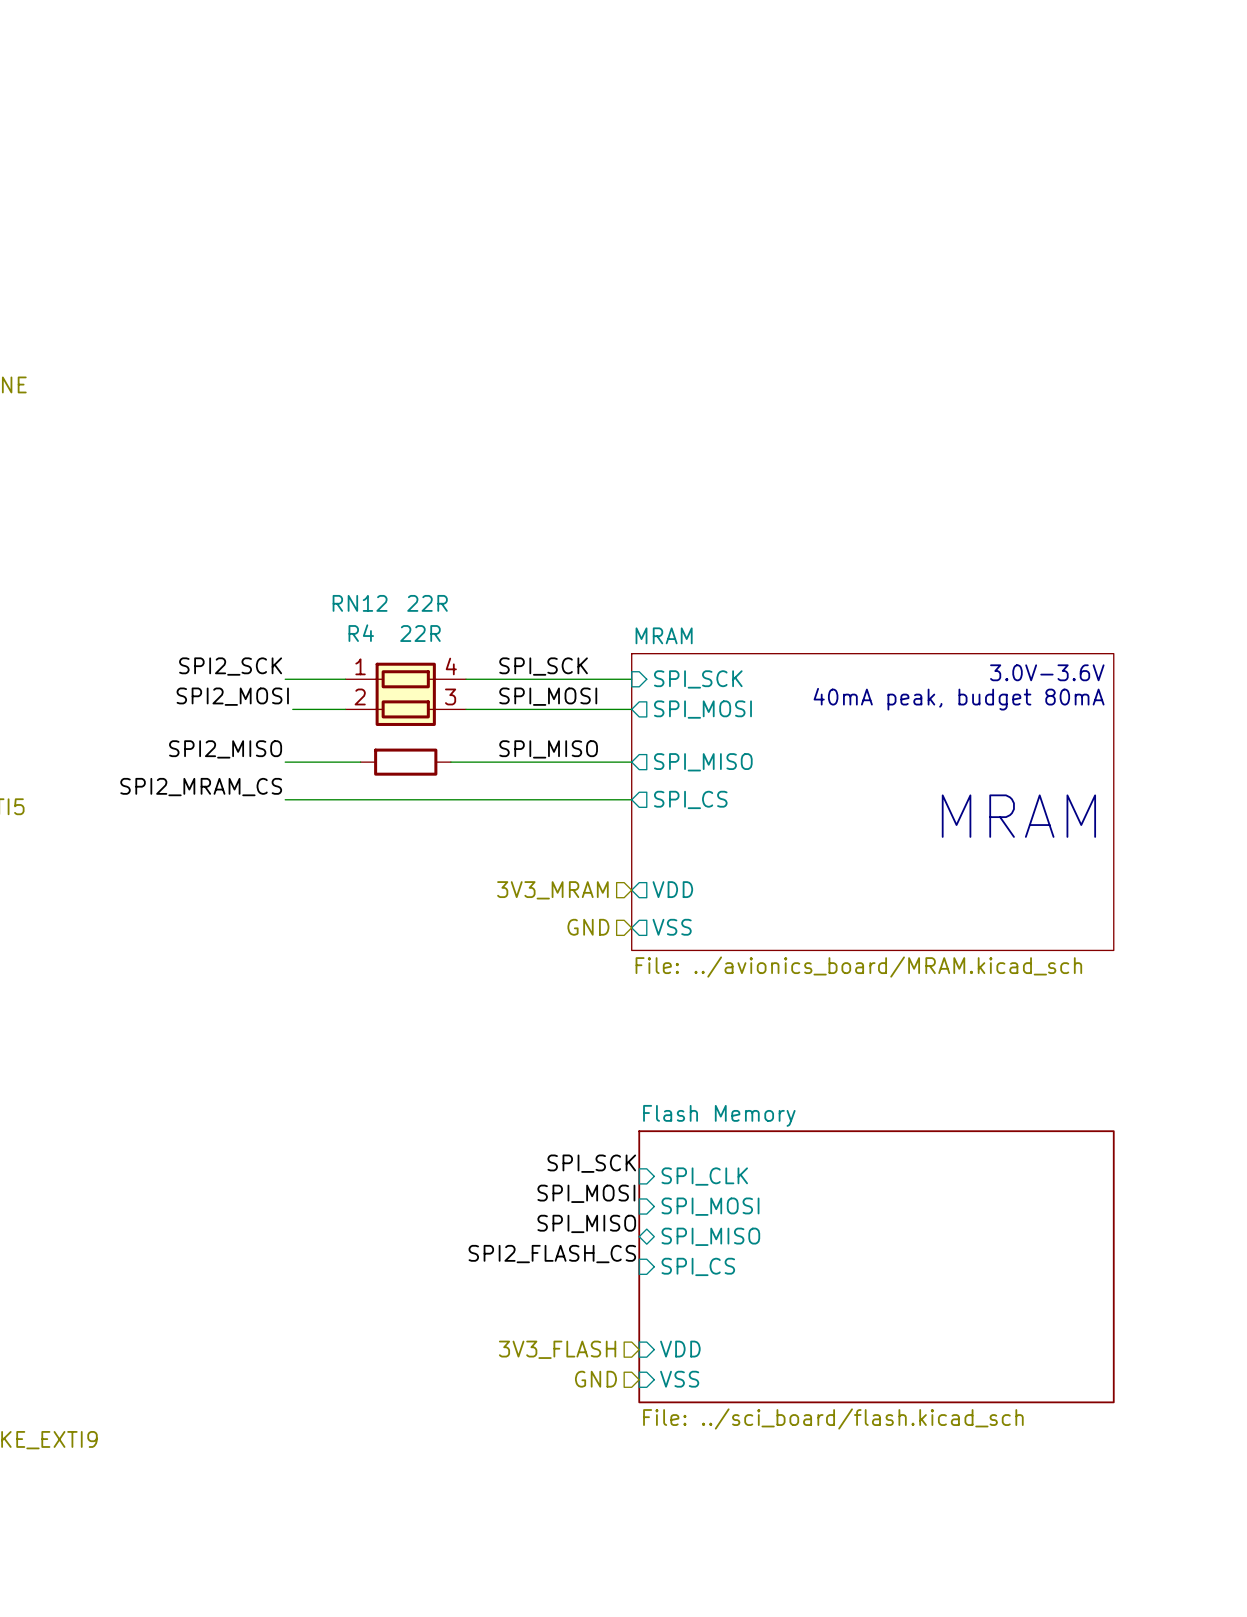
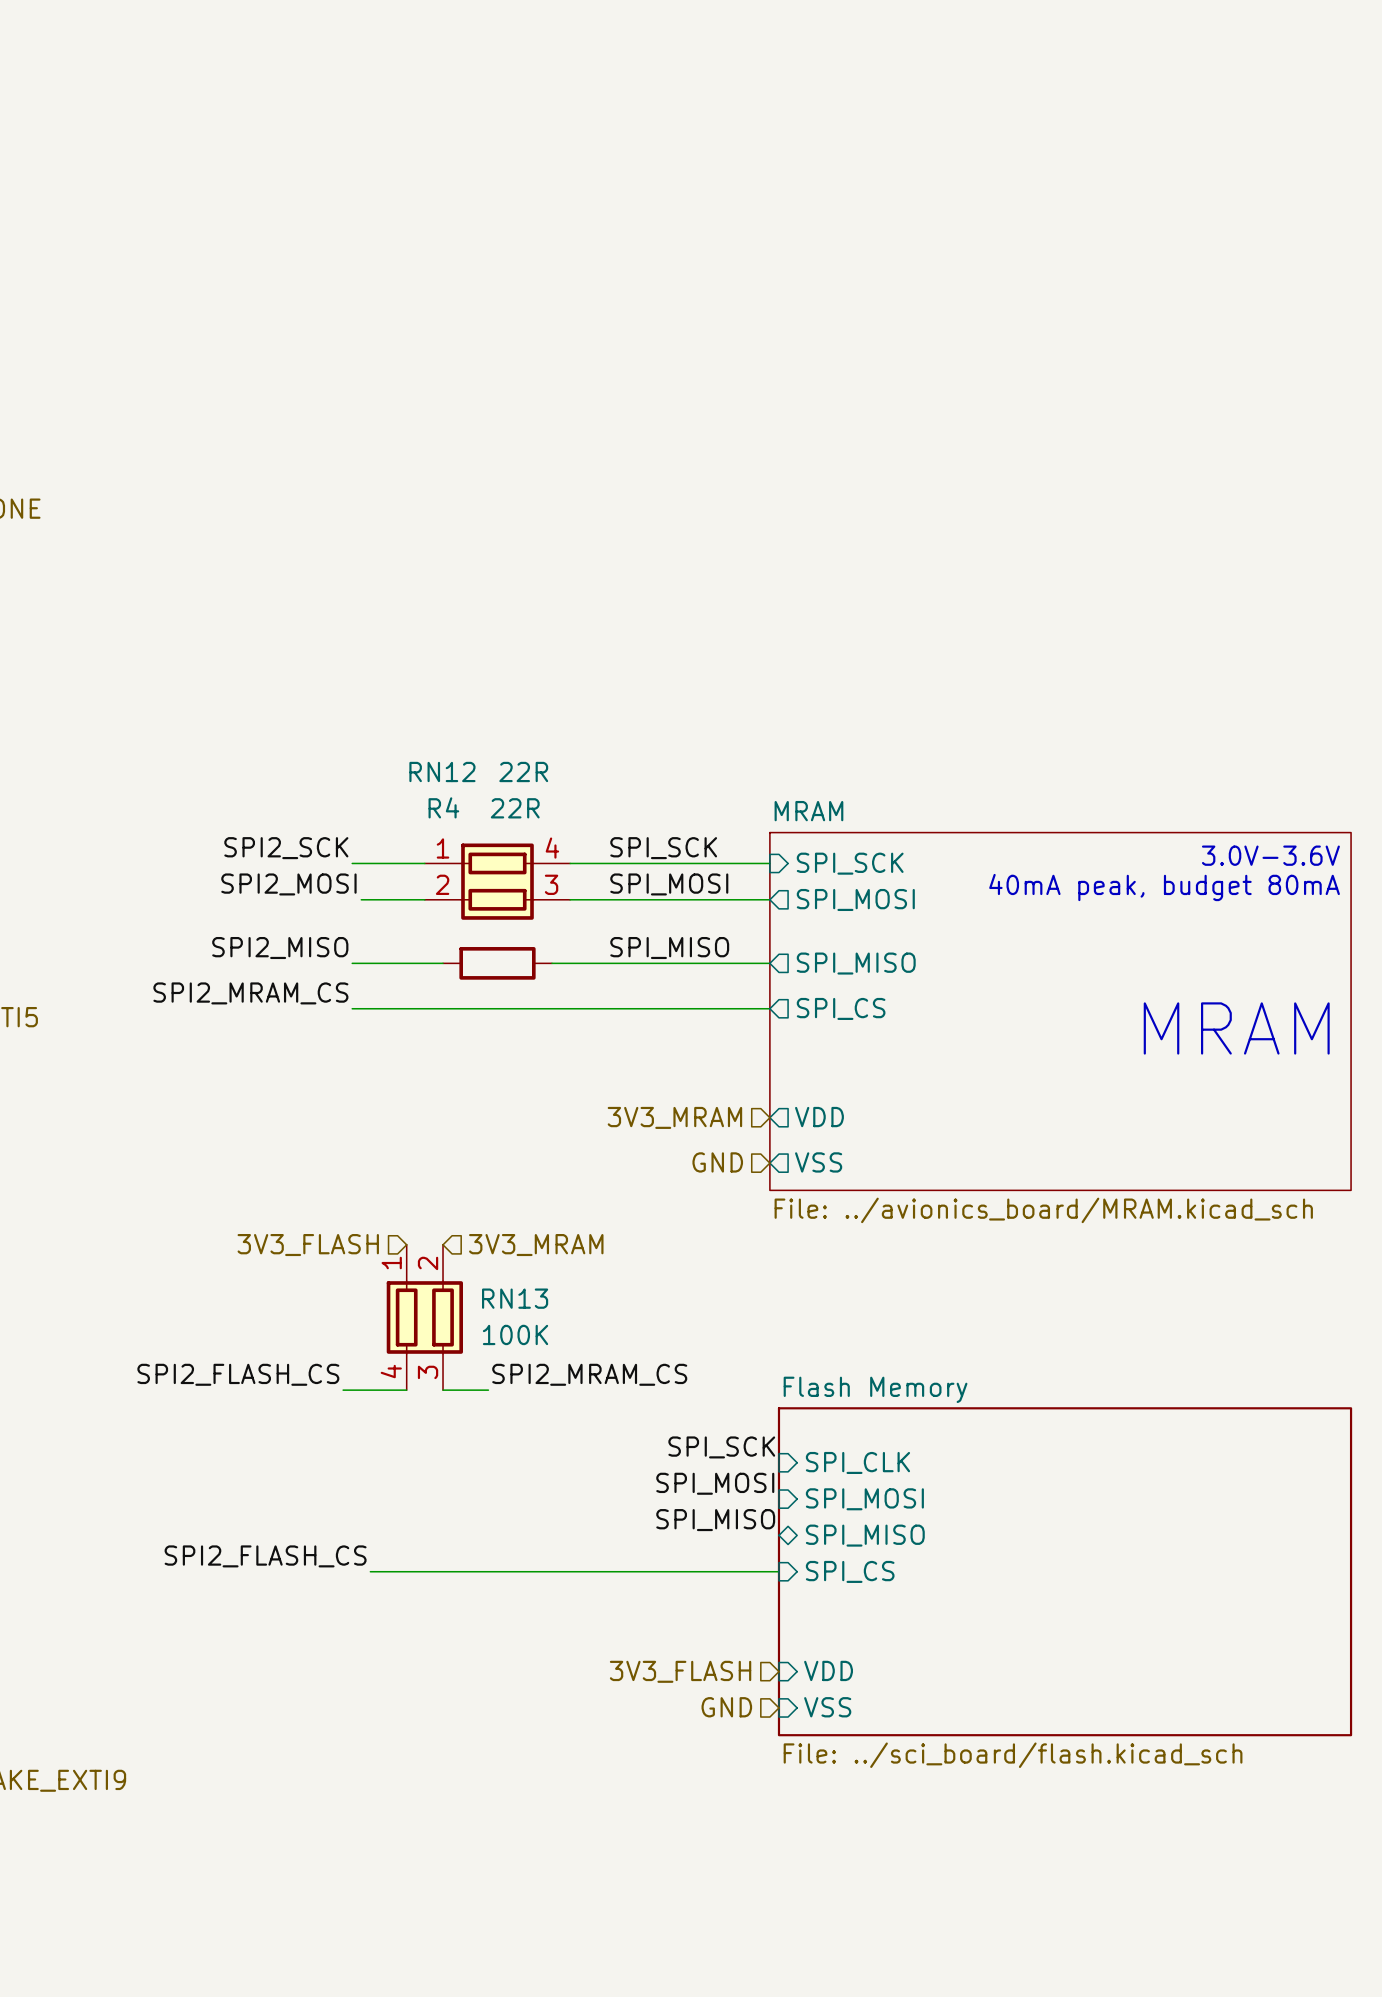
hierarchical label: none -> 3V3_FLASH (308, 1245)
hierarchical label: none -> 3V3_MRAM (536, 1245)
RN13: none -> 100K (424, 1317)
label: none -> SPI2_FLASH_CS (238, 1374)
label: none -> SPI2_MRAM_CS (589, 1374)
wire: none -> (343, 1390) (406, 1390)
wire: none -> (443, 1390) (488, 1390)
label: none -> SPI2_FLASH_CS (265, 1556)
label: SPI2_FLASH_CS (552, 1254) -> none
wire: none -> (370, 1571) (778, 1571)

